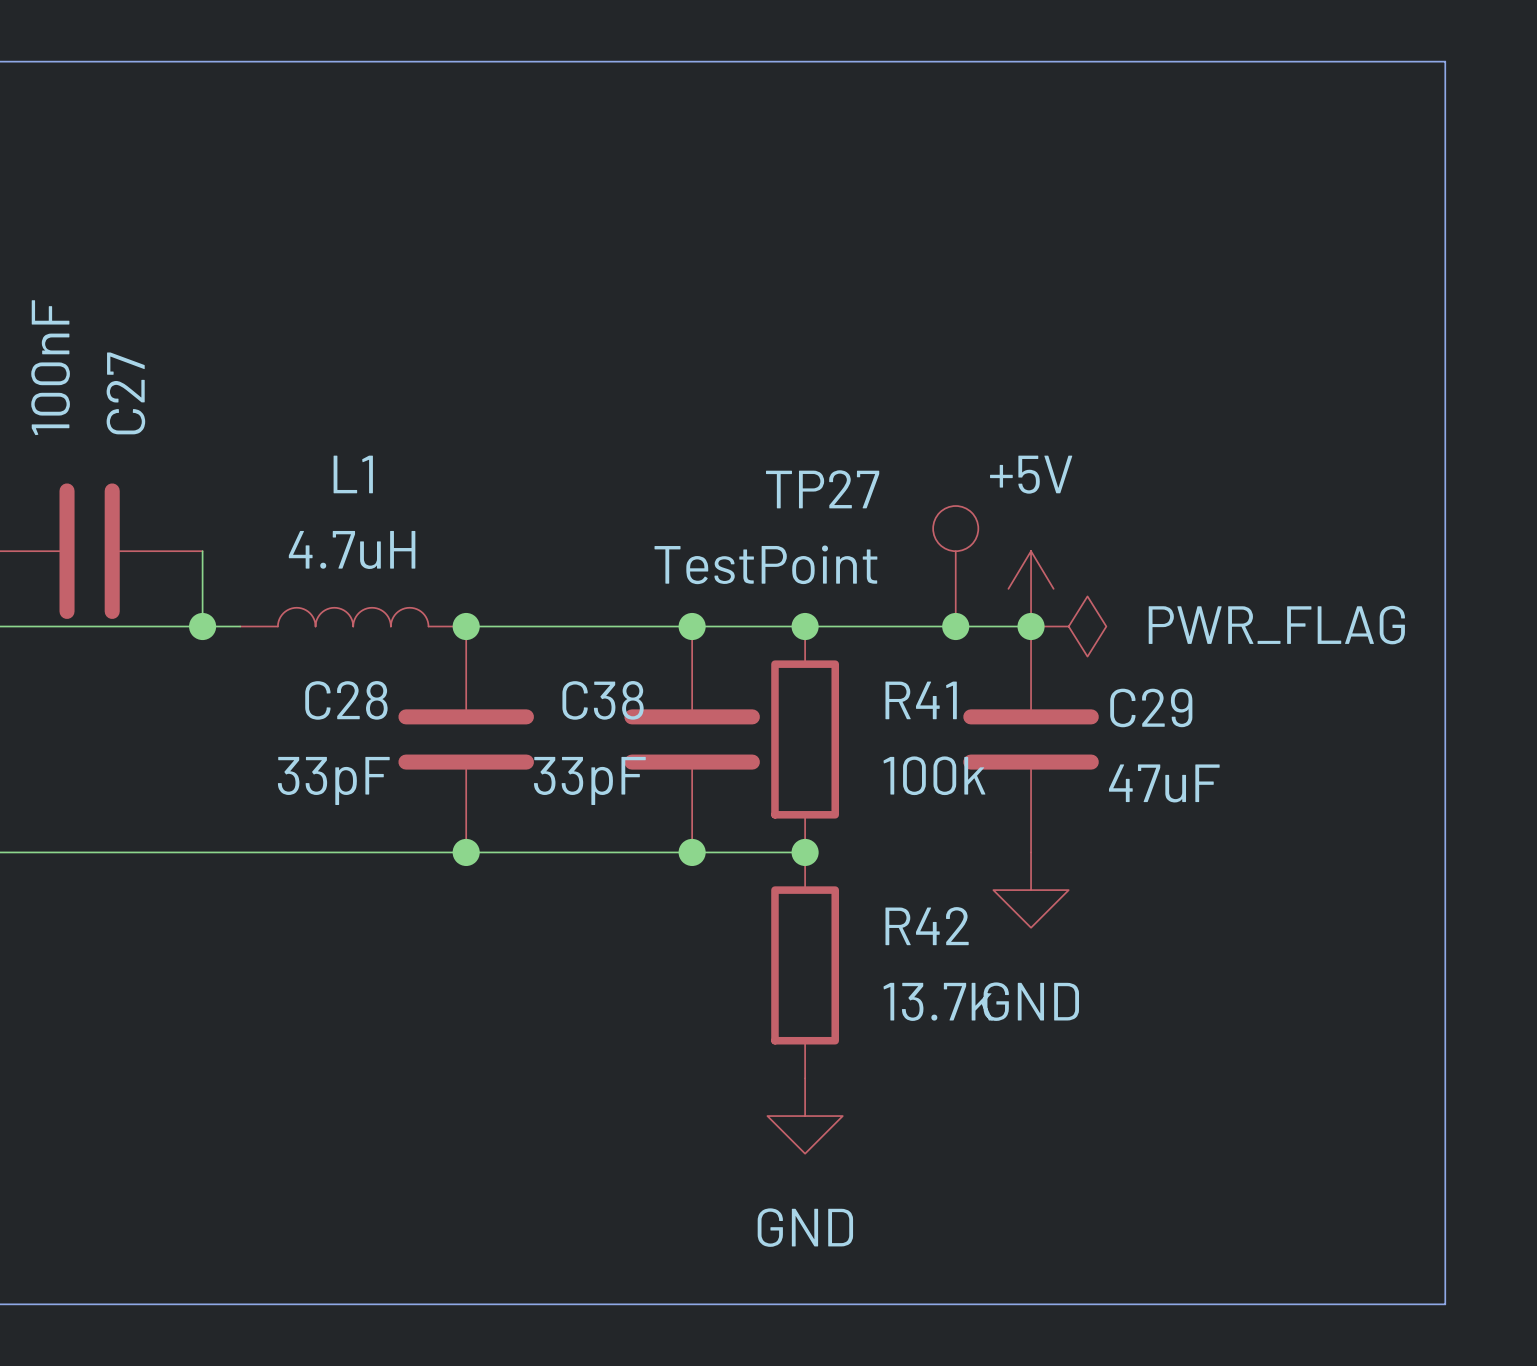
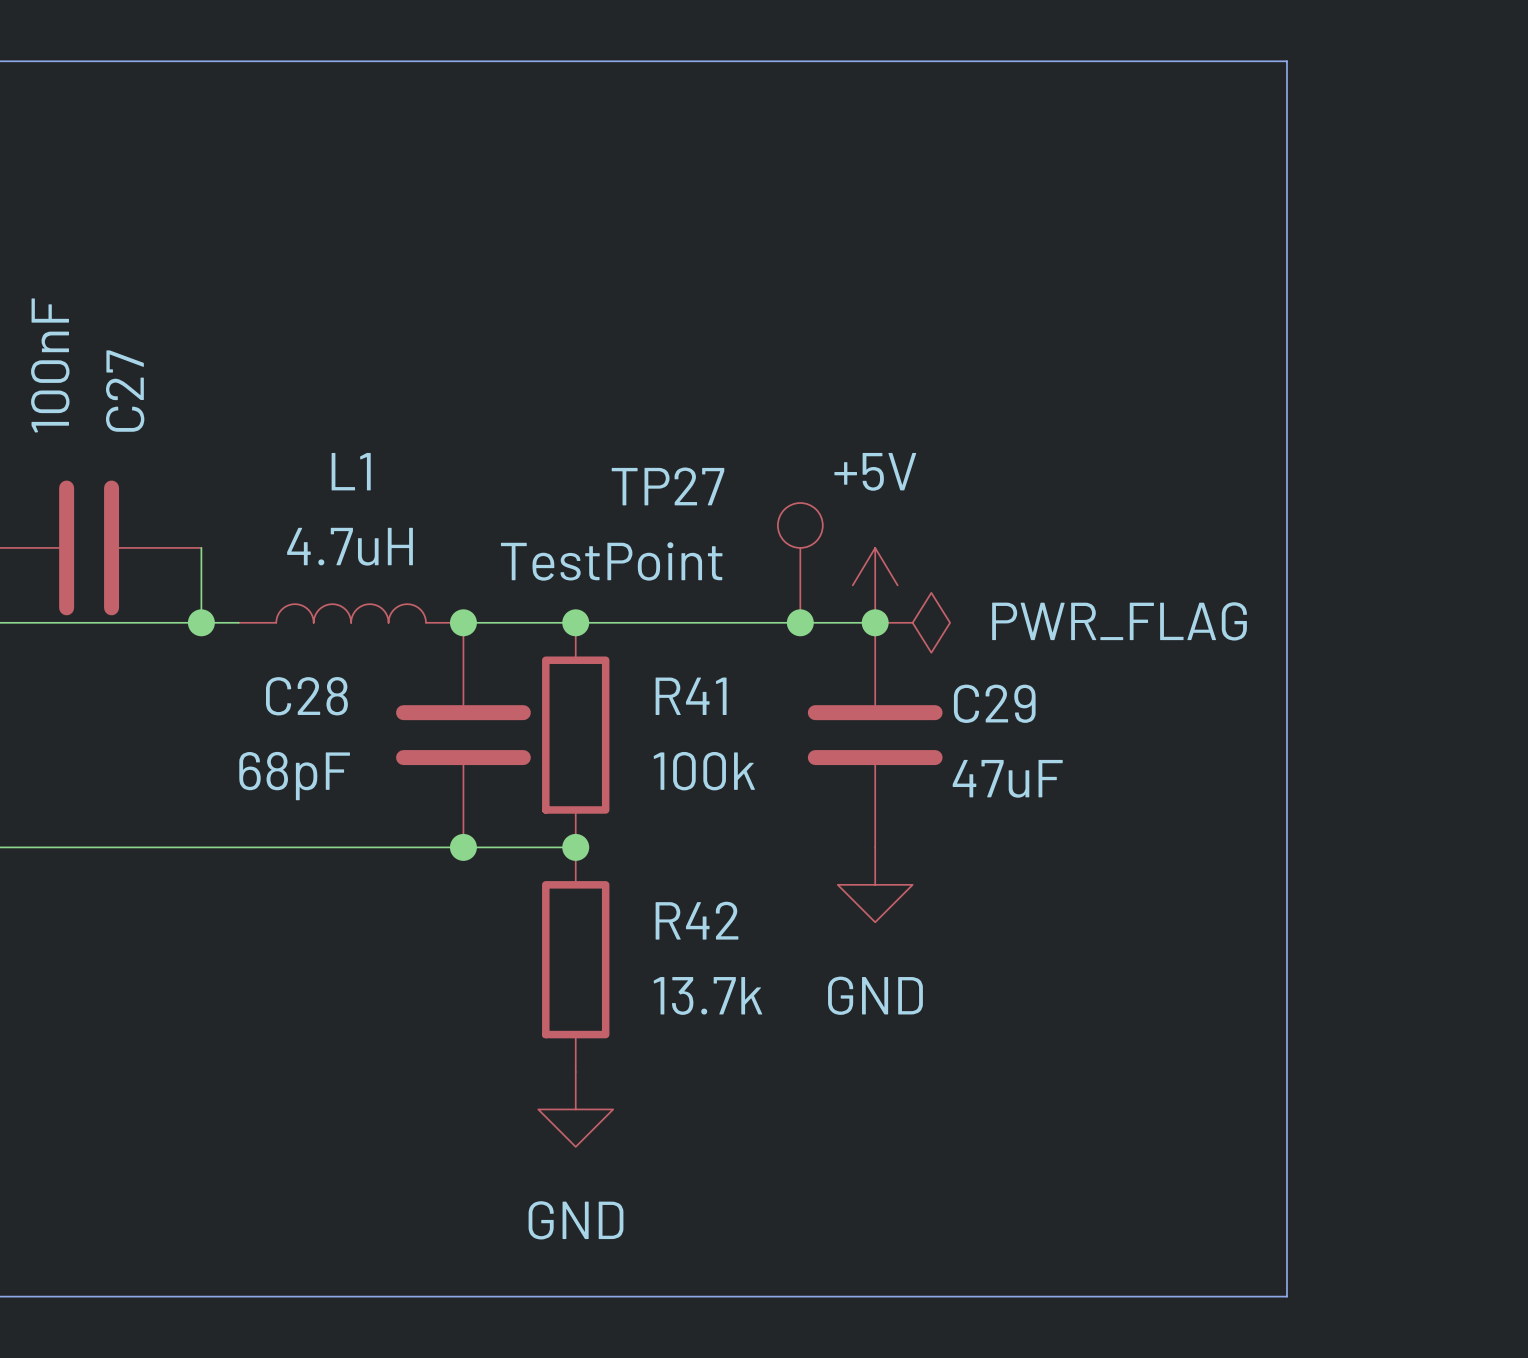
line: (1294, 61) (1445, 61) (1445, 1304) (1294, 1304) -> (1286, 61) (1286, 1296)
TP27 position: (955, 566) -> (800, 562)
power symbol position: +5V (1031, 588) -> +5V (875, 585)
junction: none -> (575, 622)
junction: (692, 626) -> none
wire: (880, 626) (1031, 626) -> none
junction: none -> (875, 622)
junction: (955, 626) -> none
junction: (1031, 626) -> none
power symbol position: PWR_FLAG (1068, 626) -> PWR_FLAG (912, 622)
C28 name position: C28 (346, 700) -> C28 (306, 696)
C38: 33pF (692, 739) -> none
R41 position: (805, 739) -> (575, 735)
C29 position: (1031, 739) -> (875, 735)
C28 value: 33pF (333, 780) -> 68pF (294, 776)
wire: (579, 852) (805, 852) -> none
junction: none -> (575, 847)
junction: (692, 852) -> none
junction: (805, 852) -> none
power symbol: none -> GND (875, 884)
power symbol: GND (1031, 890) -> none
R42 position: (805, 965) -> (575, 959)
power symbol: none -> GND (575, 1109)
power symbol: GND (805, 1116) -> none

